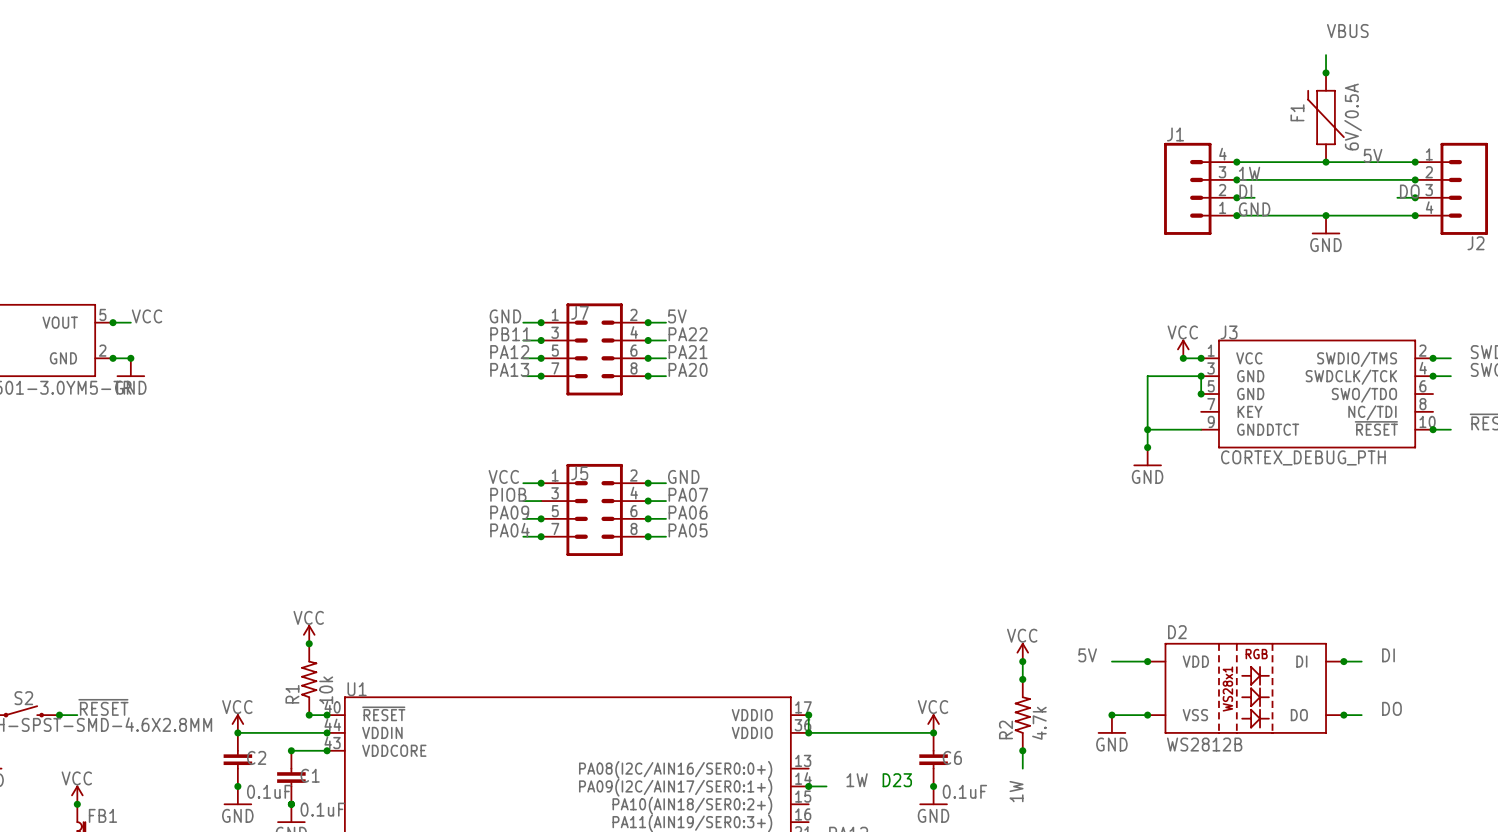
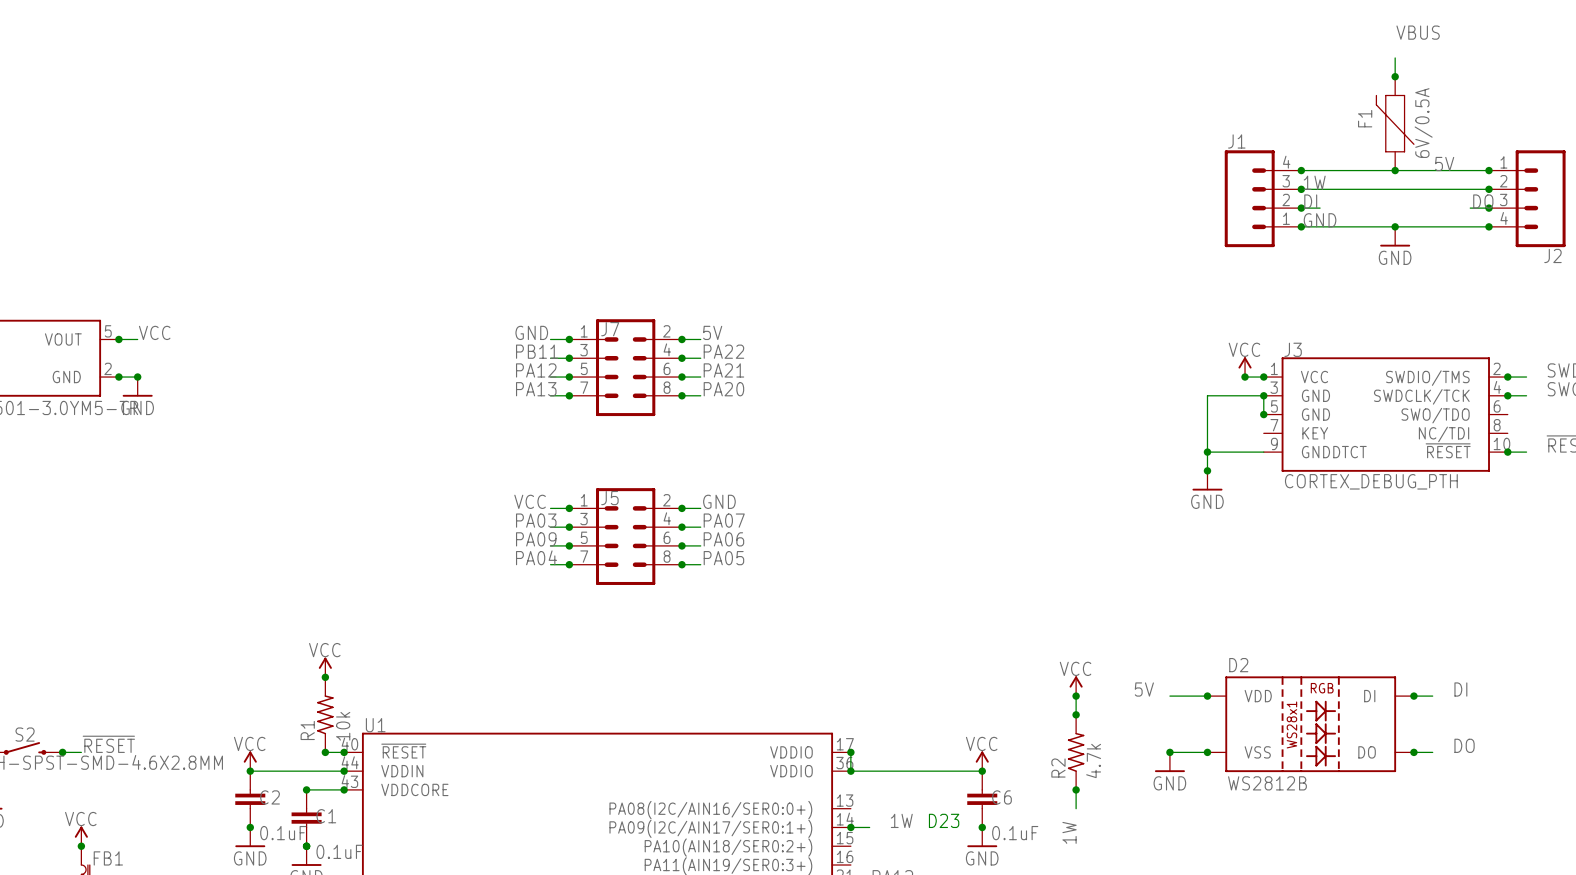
label: PIOB (508, 494) -> PA03 (536, 520)
junction: none -> (569, 527)

